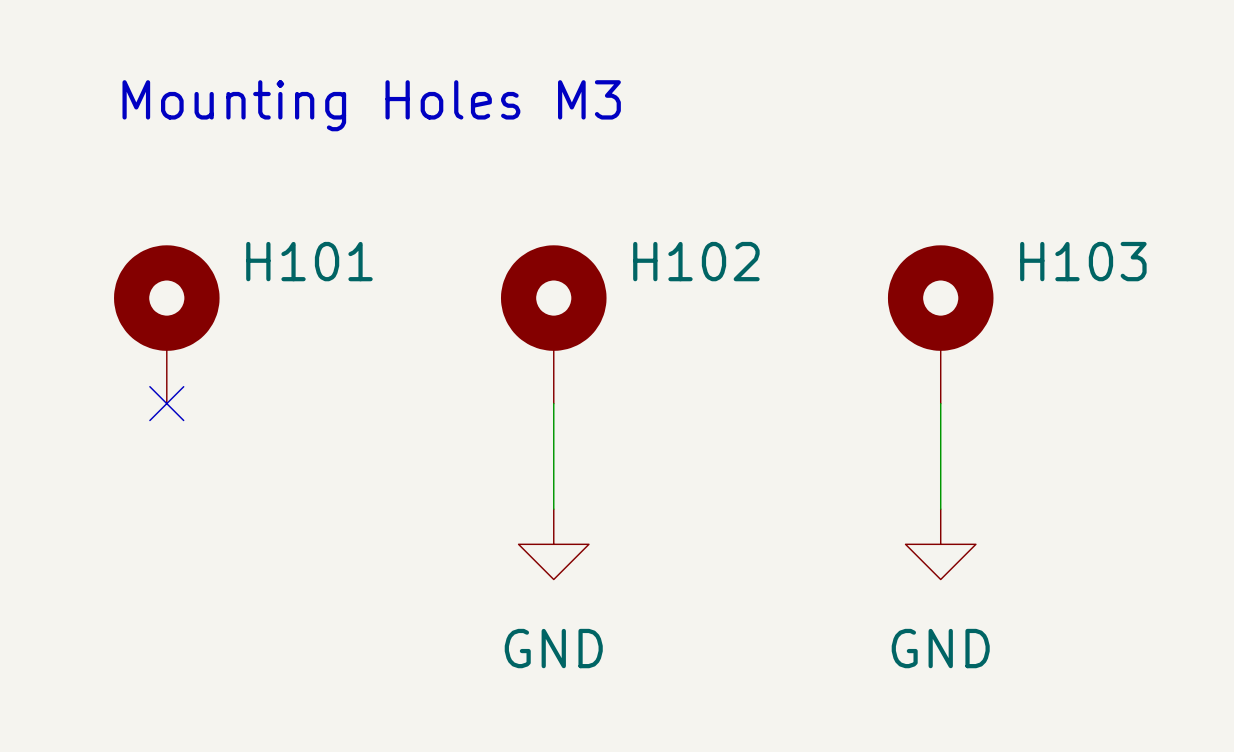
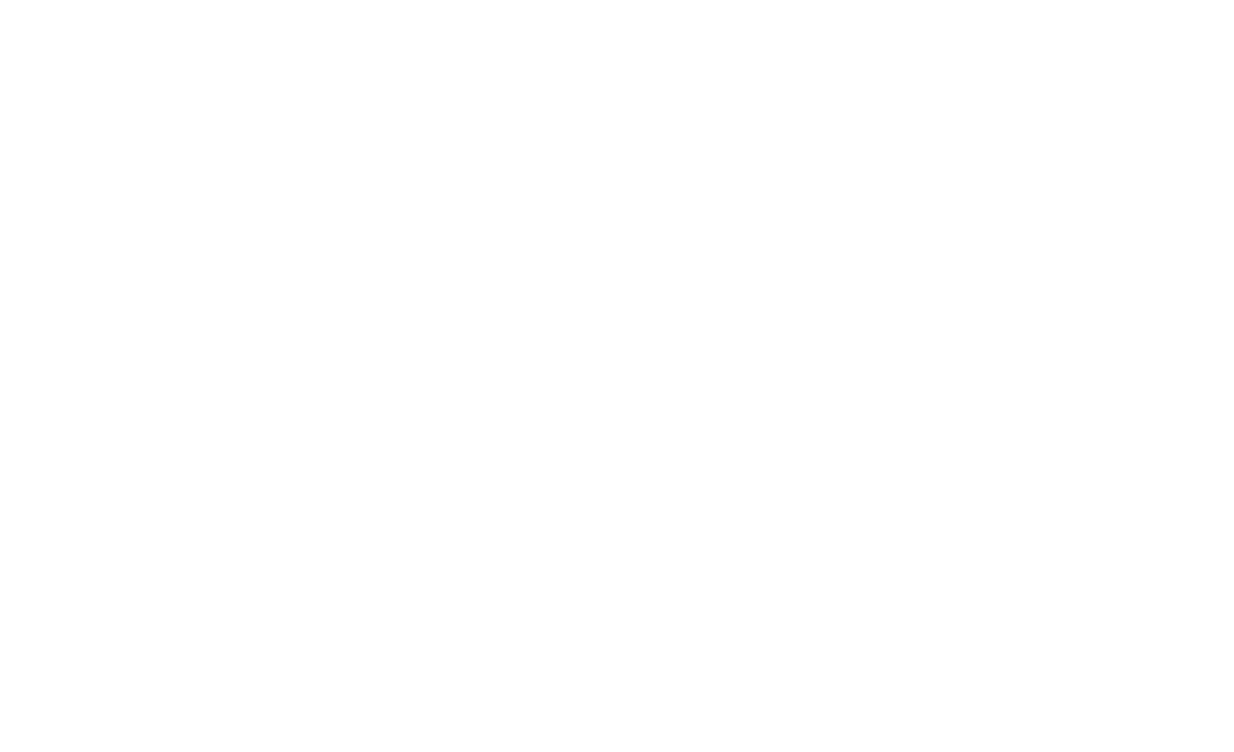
text: Mounting Holes M3 (371, 105) -> none
H101: (166, 324) -> none
H102: (553, 324) -> none
H103: (940, 324) -> none
no-connect mark: (166, 403) -> none
wire: (553, 403) (553, 509) -> none
wire: (940, 403) (940, 509) -> none
power symbol: GND (553, 544) -> none
power symbol: GND (940, 544) -> none

